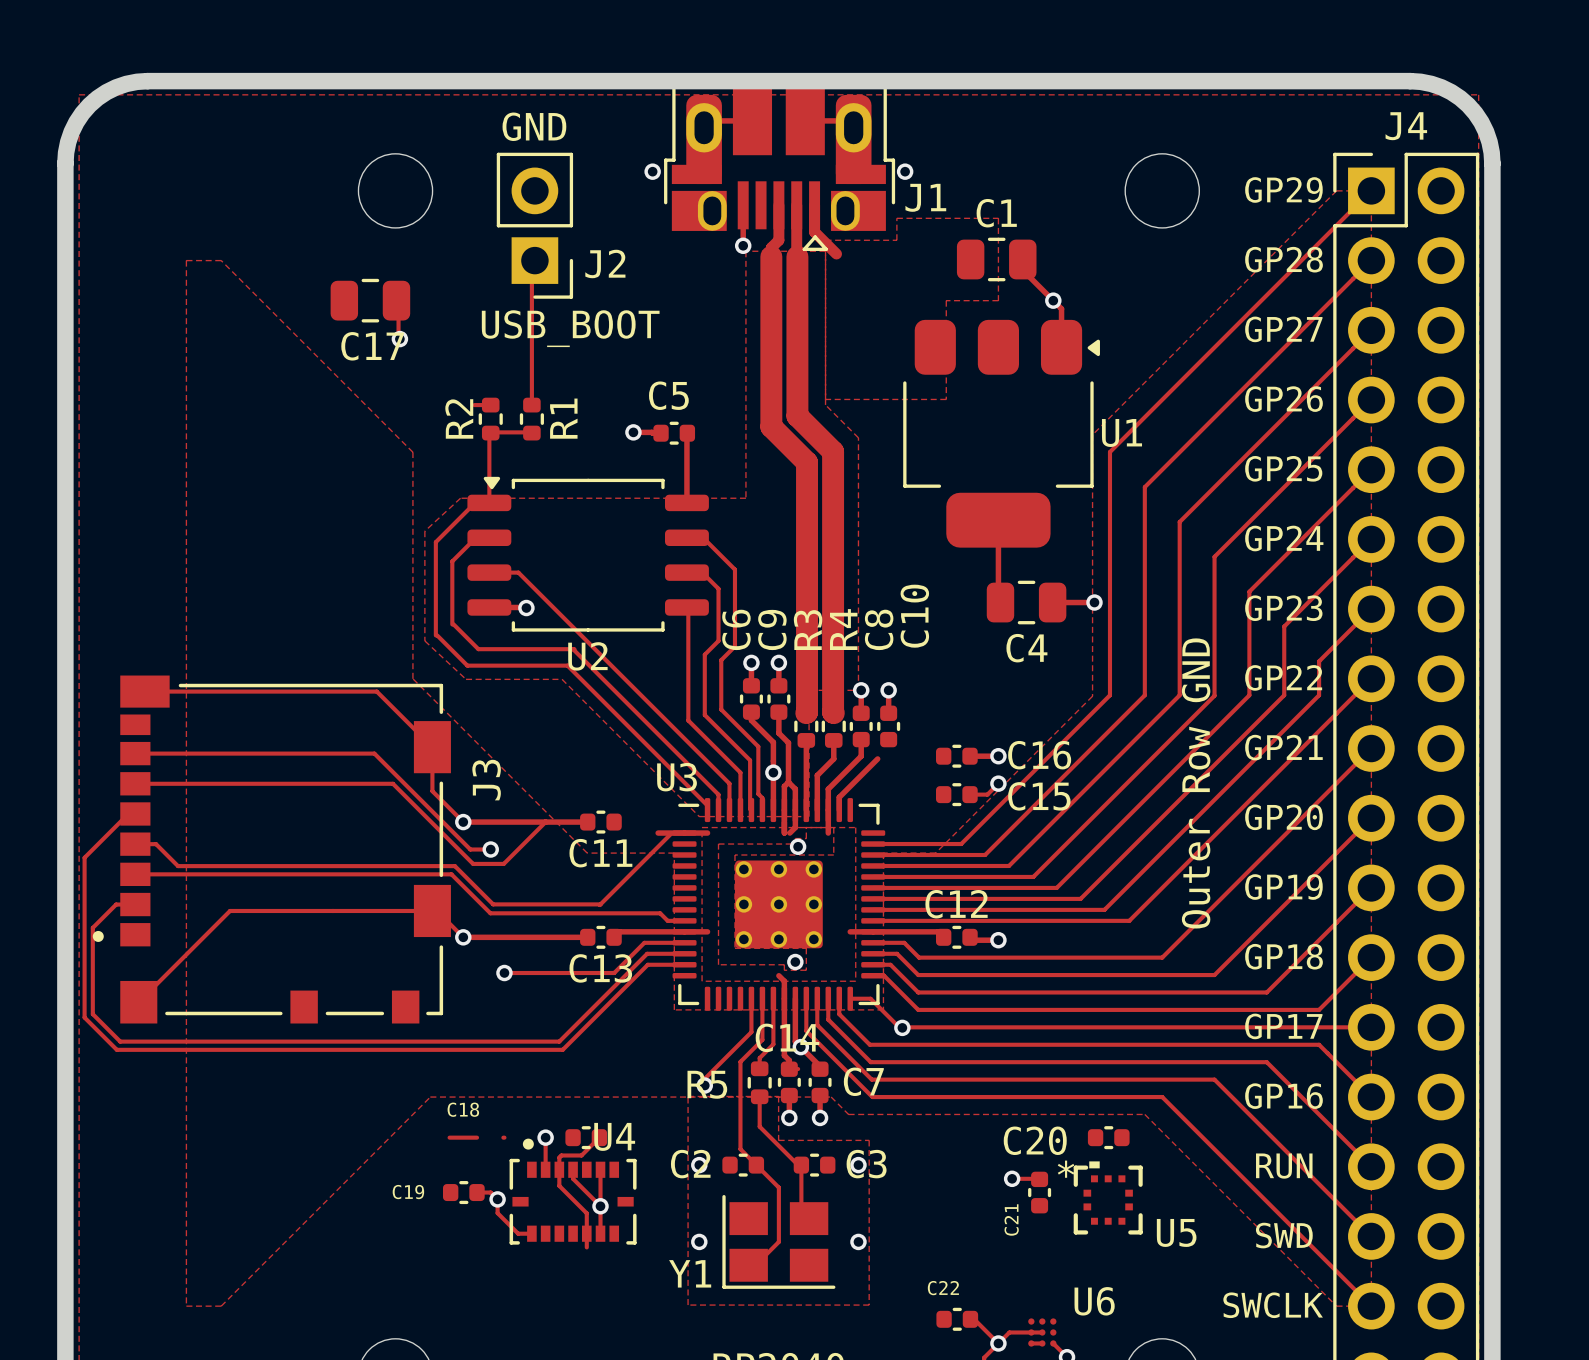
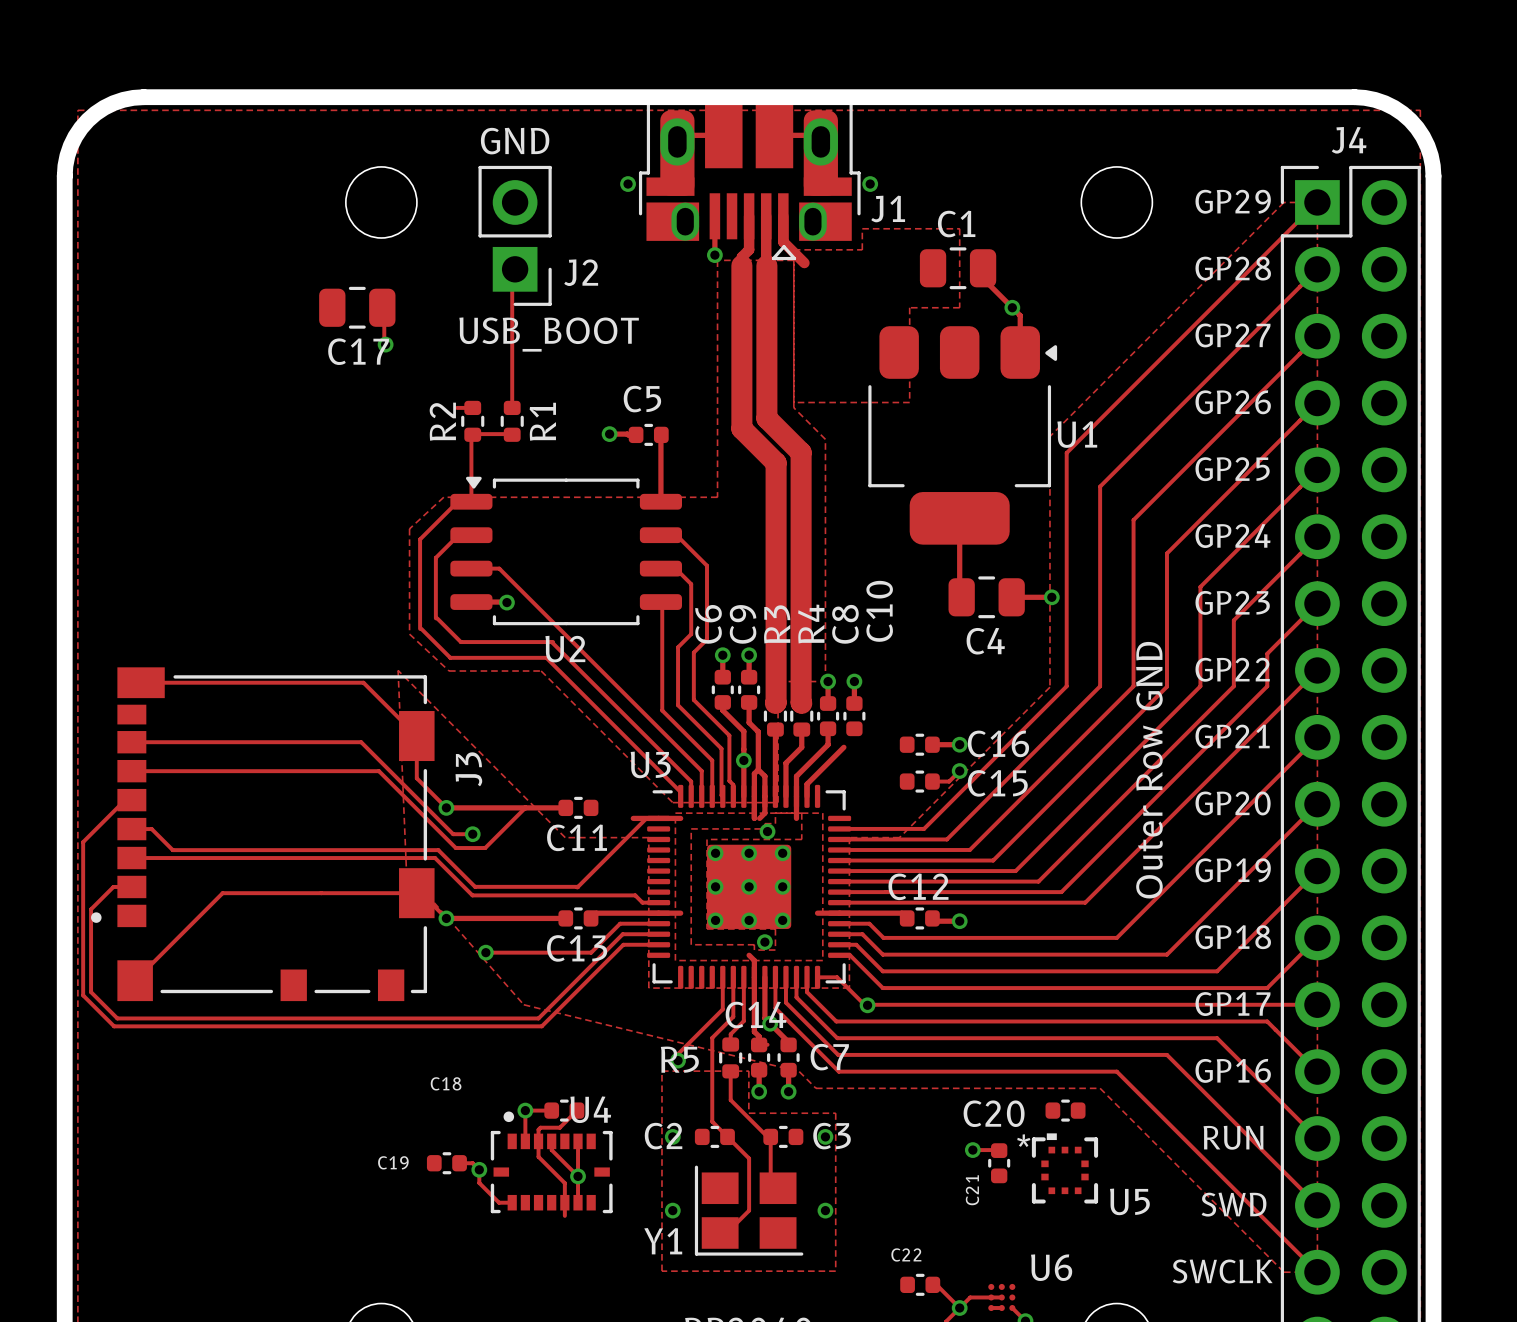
zone outline: (412, 678) (412, 452) (221, 260) (186, 260) (186, 1306) (221, 1306) (430, 1097) (831, 1097) -> (398, 670) (406, 871) (523, 1004) (799, 1071)
track: (449, 1137) (477, 1137) -> (525, 1110) (551, 1110)
track: (503, 1137) (504, 1137) -> none

